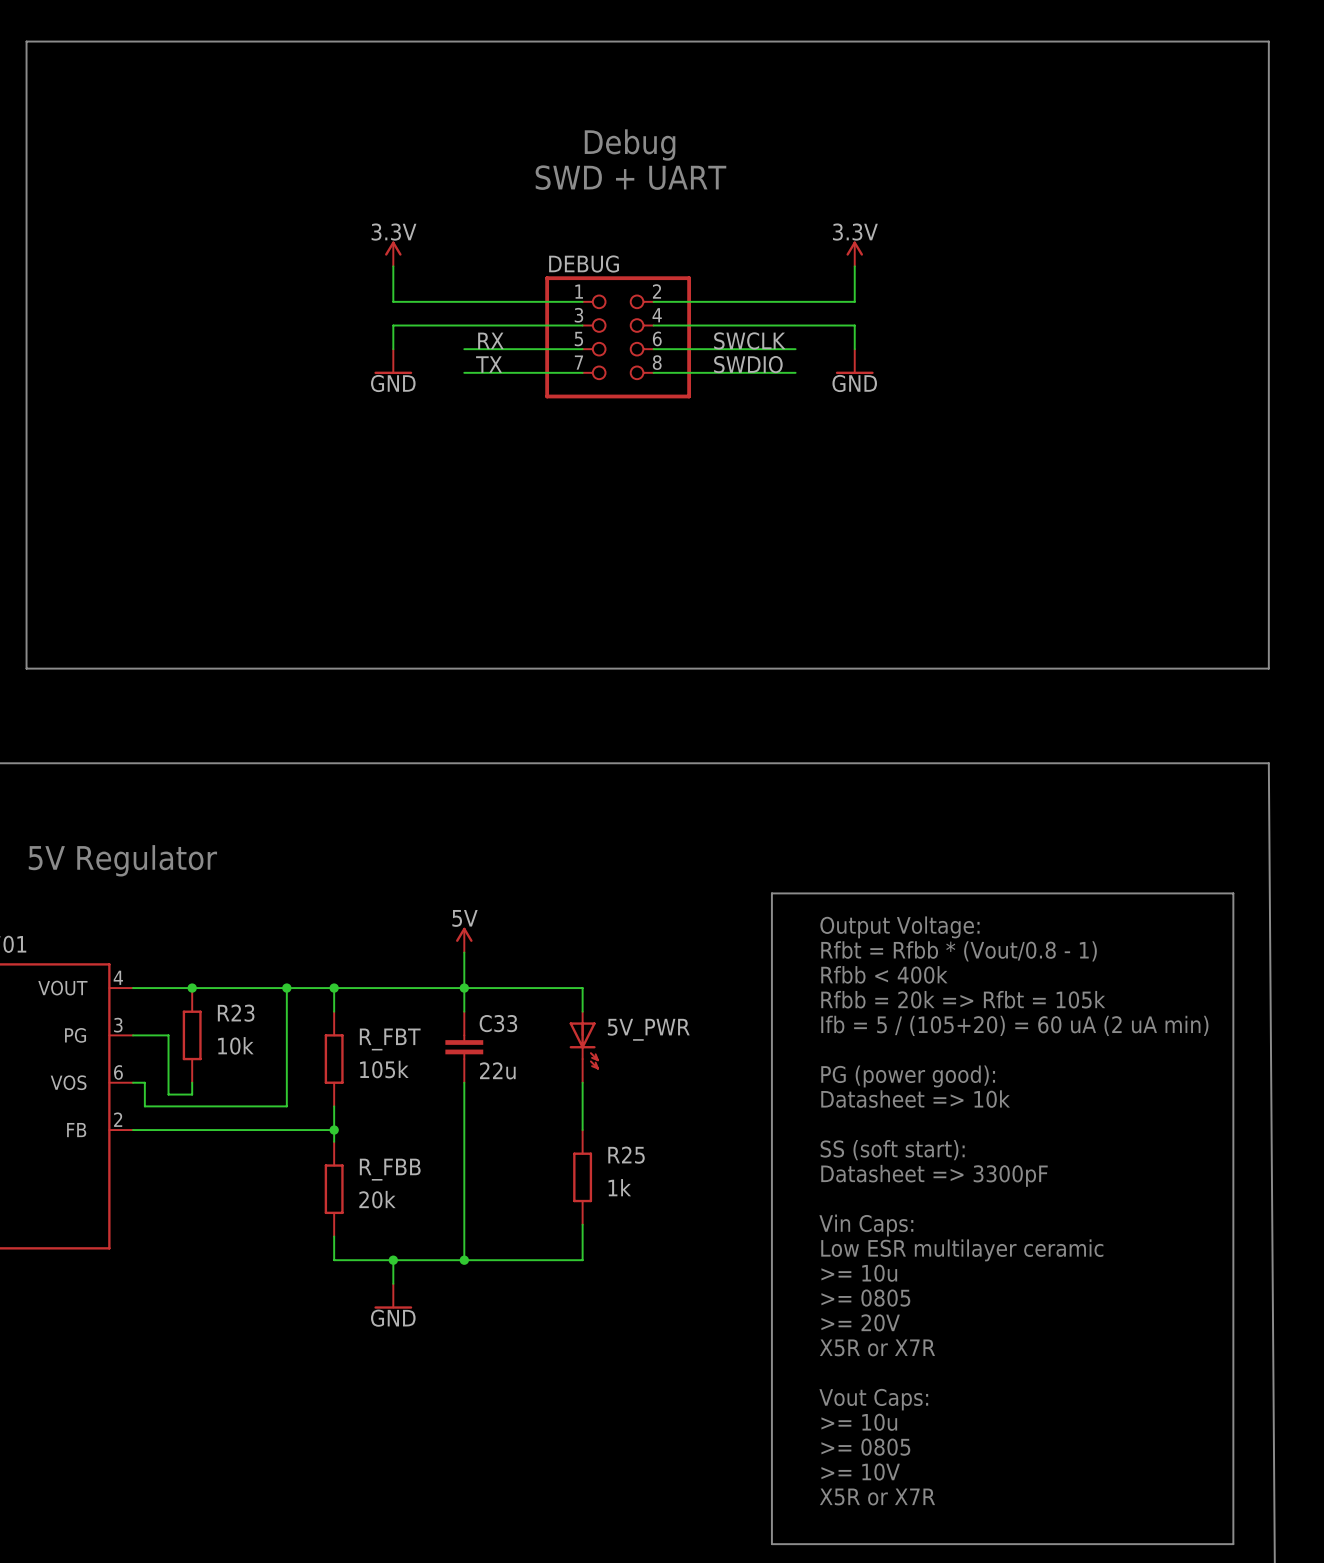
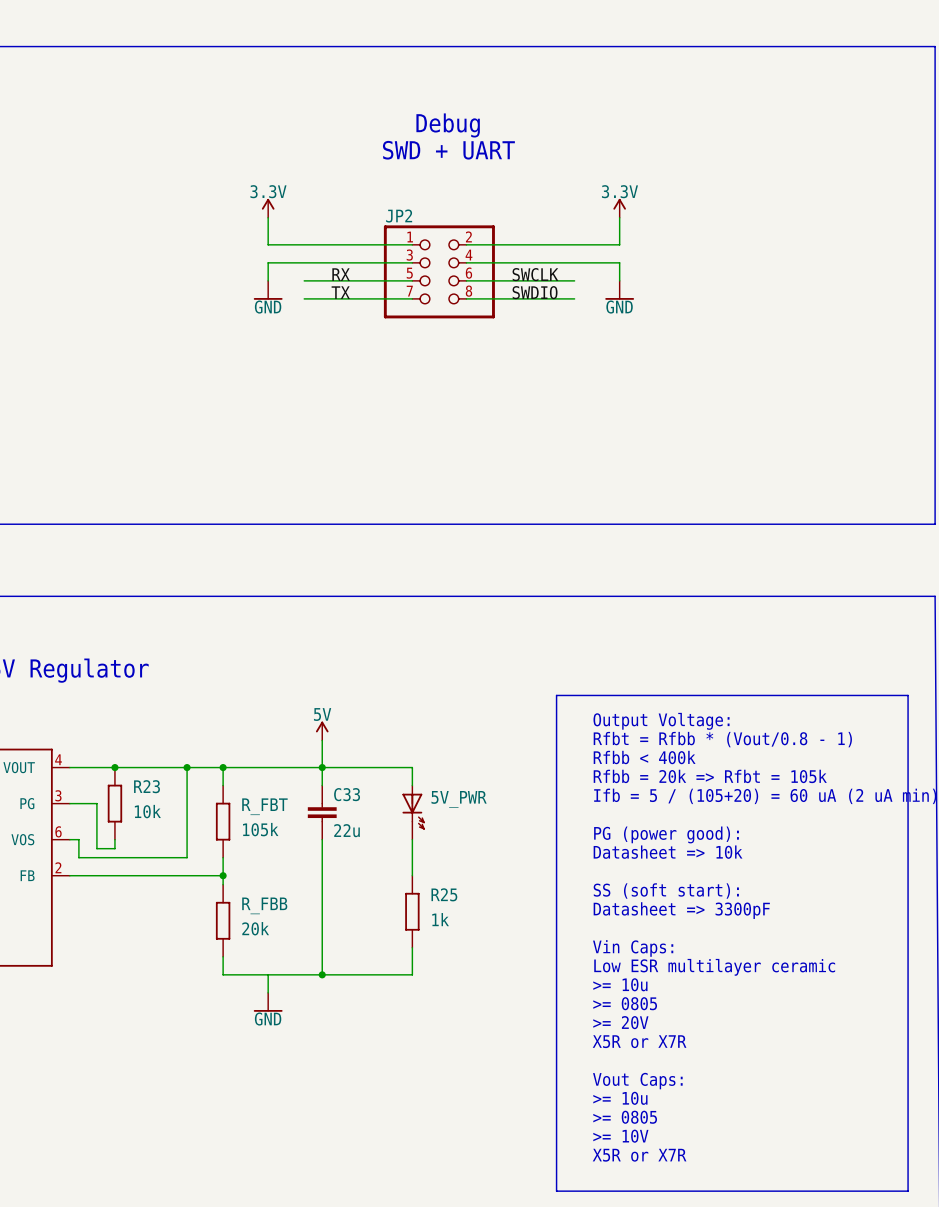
DEBUG name: DEBUG (584, 263) -> JP2 (399, 216)
wire: none -> (304, 280) (322, 280)
wire: none -> (304, 298) (322, 298)
junction: (393, 1260) -> none

